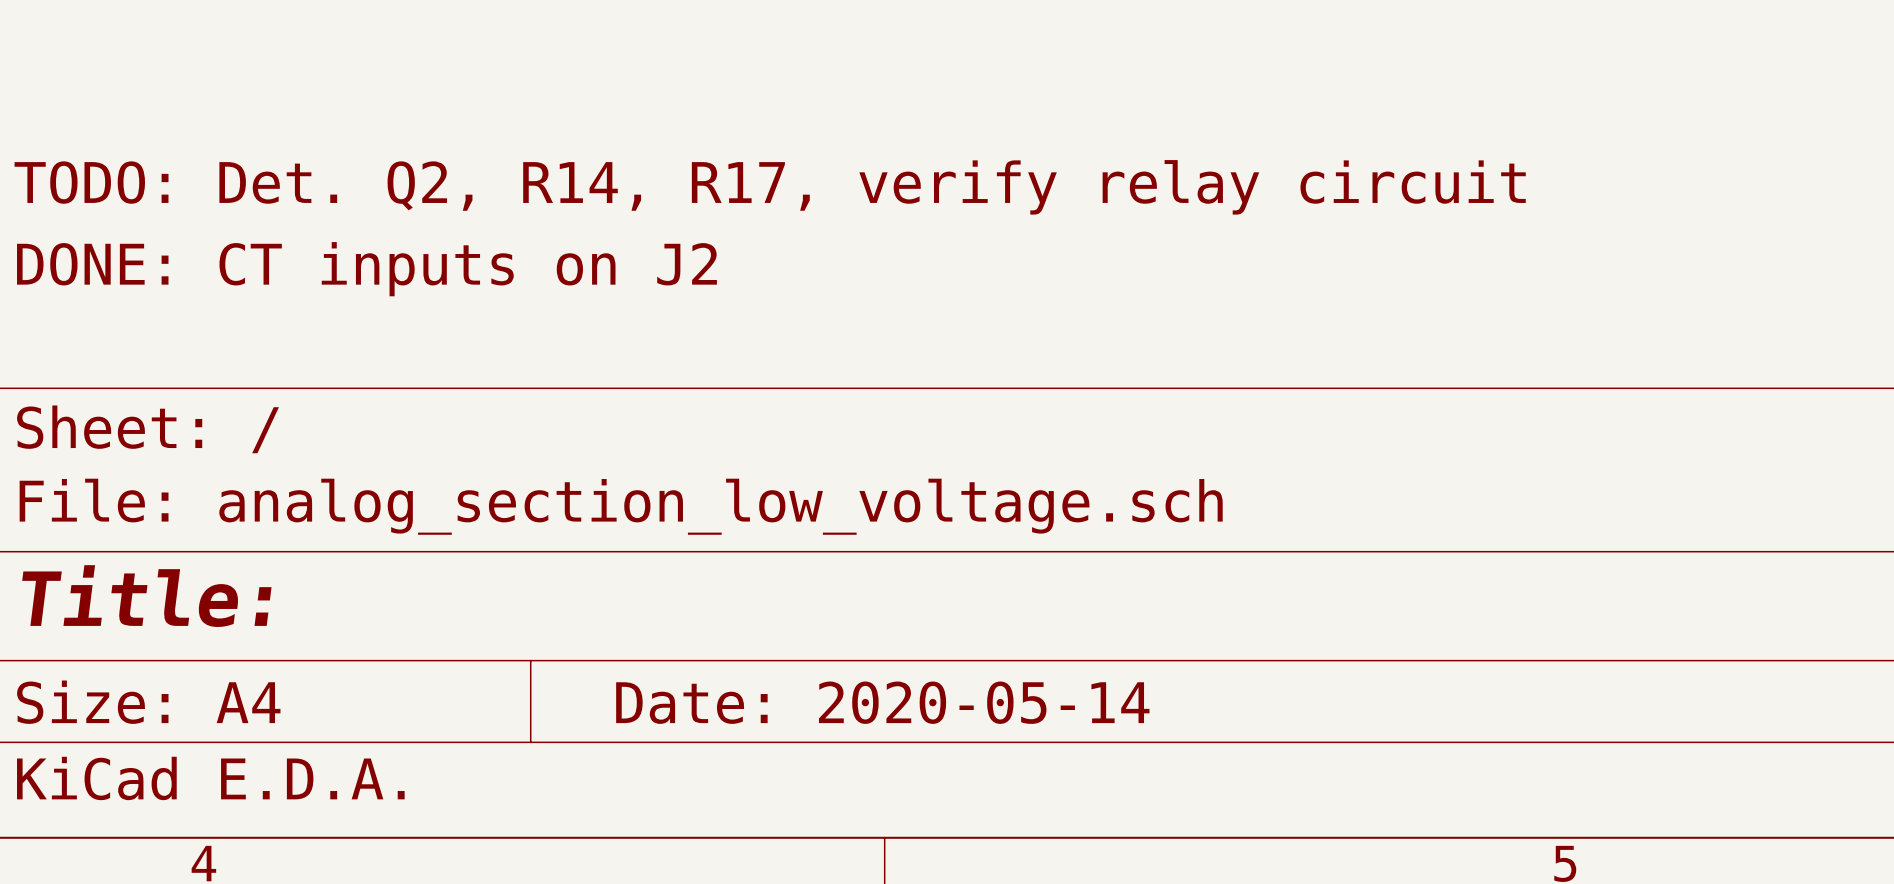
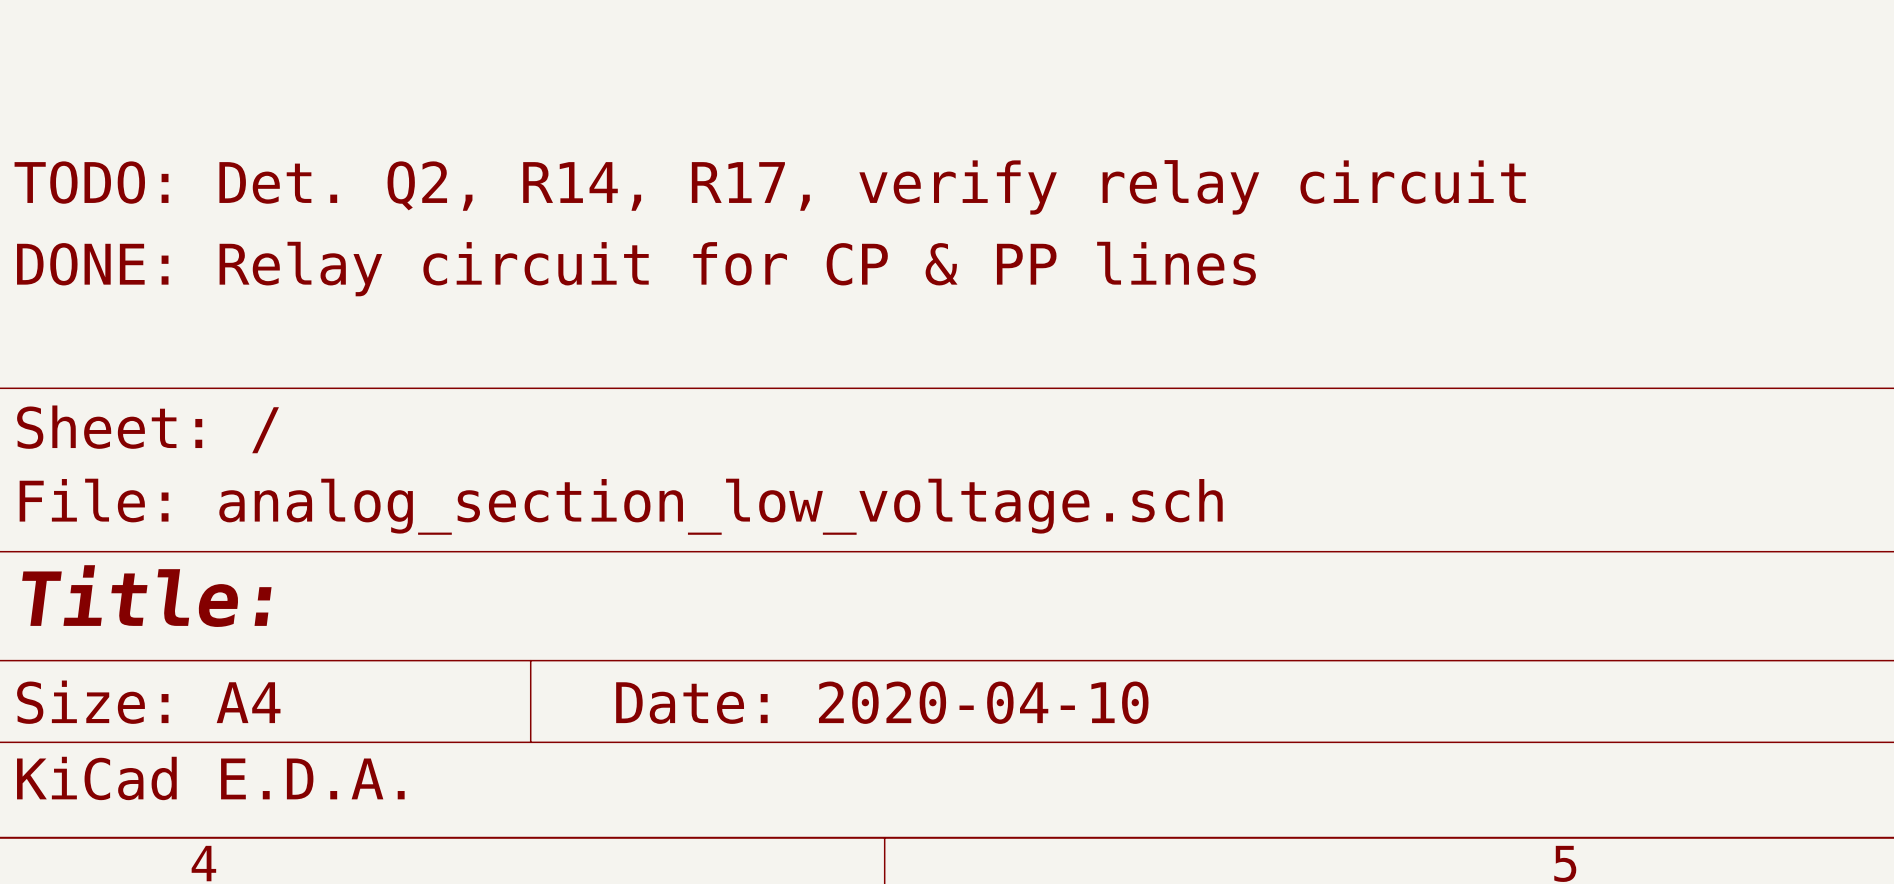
title block: DONE: CT inputs on J2 (366, 269) -> DONE: Relay circuit for CP & PP lines (636, 269)
title block: Date: 2020-05-14 (882, 702) -> Date: 2020-04-10 (882, 702)

